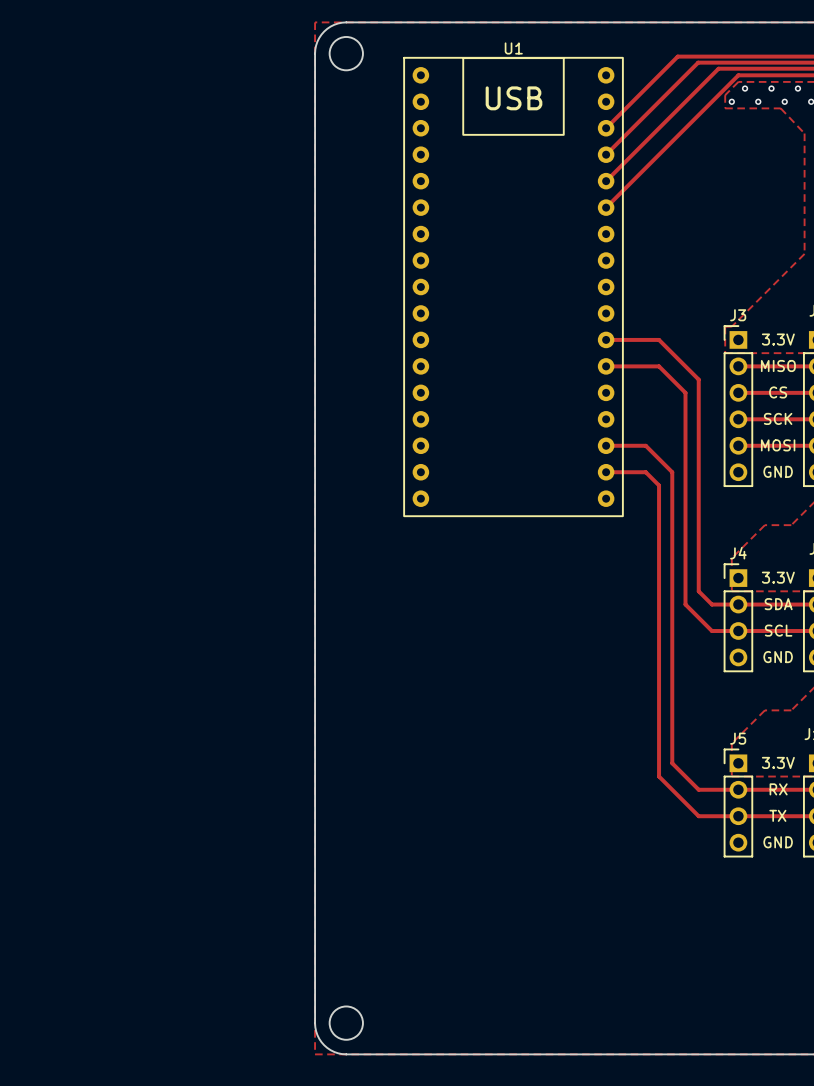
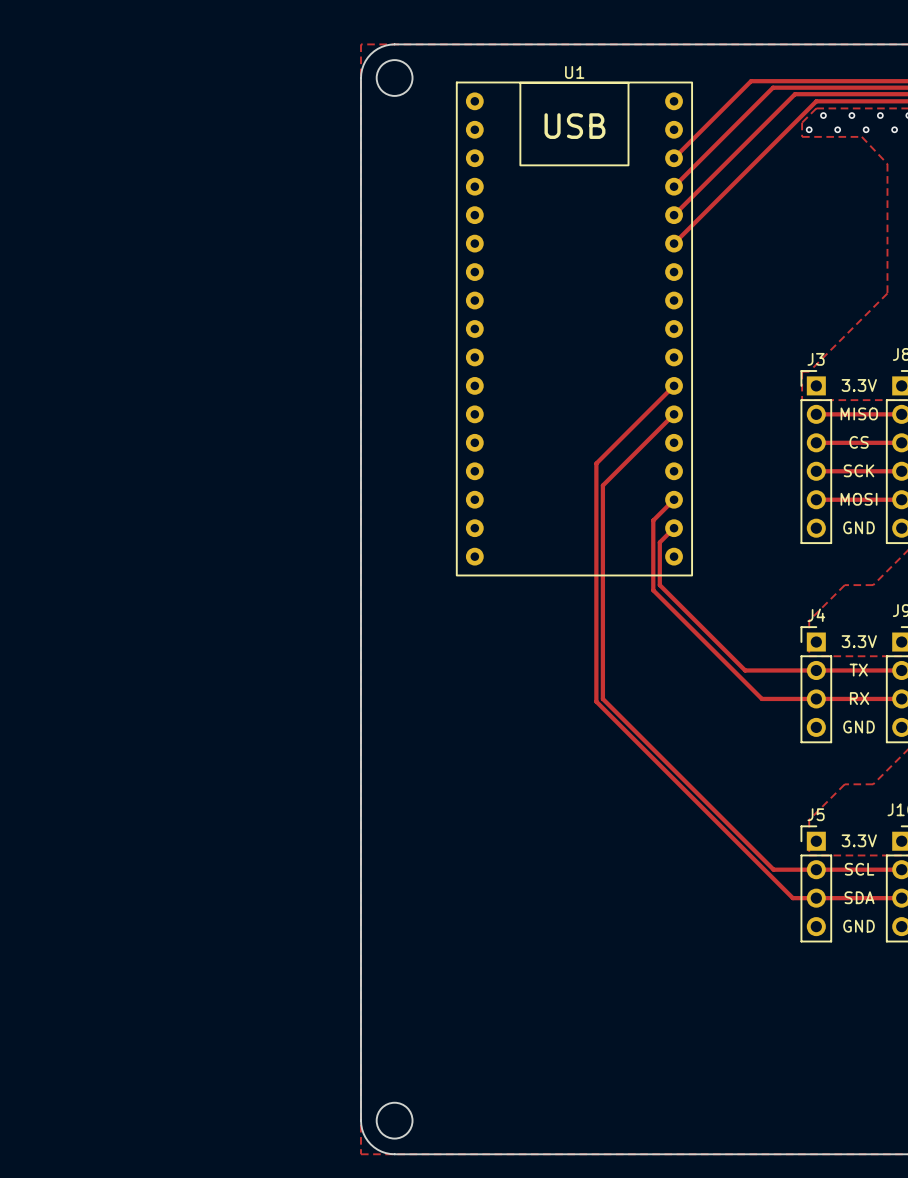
track: (606, 339) (659, 339) (698, 379) (698, 591) (711, 604) -> (674, 528) (659, 542) (659, 585) (745, 670) (787, 670)
track: (606, 366) (659, 366) (685, 392) (685, 604) (711, 631) -> (674, 499) (653, 520) (653, 590) (761, 698) (787, 698)
track: (606, 445) (645, 445) (672, 472) (672, 763) -> (674, 414) (602, 485) (602, 698) (745, 841)
track: (606, 472) (645, 472) (659, 485) (659, 776) (698, 816) (716, 816) -> (674, 385) (596, 463) (596, 701) (792, 898)
text: SDA (778, 604) -> TX (858, 670)
text: SCL (778, 630) -> RX (859, 698)
text: RX (778, 789) -> SCL (859, 869)
text: TX (777, 815) -> SDA (859, 897)

